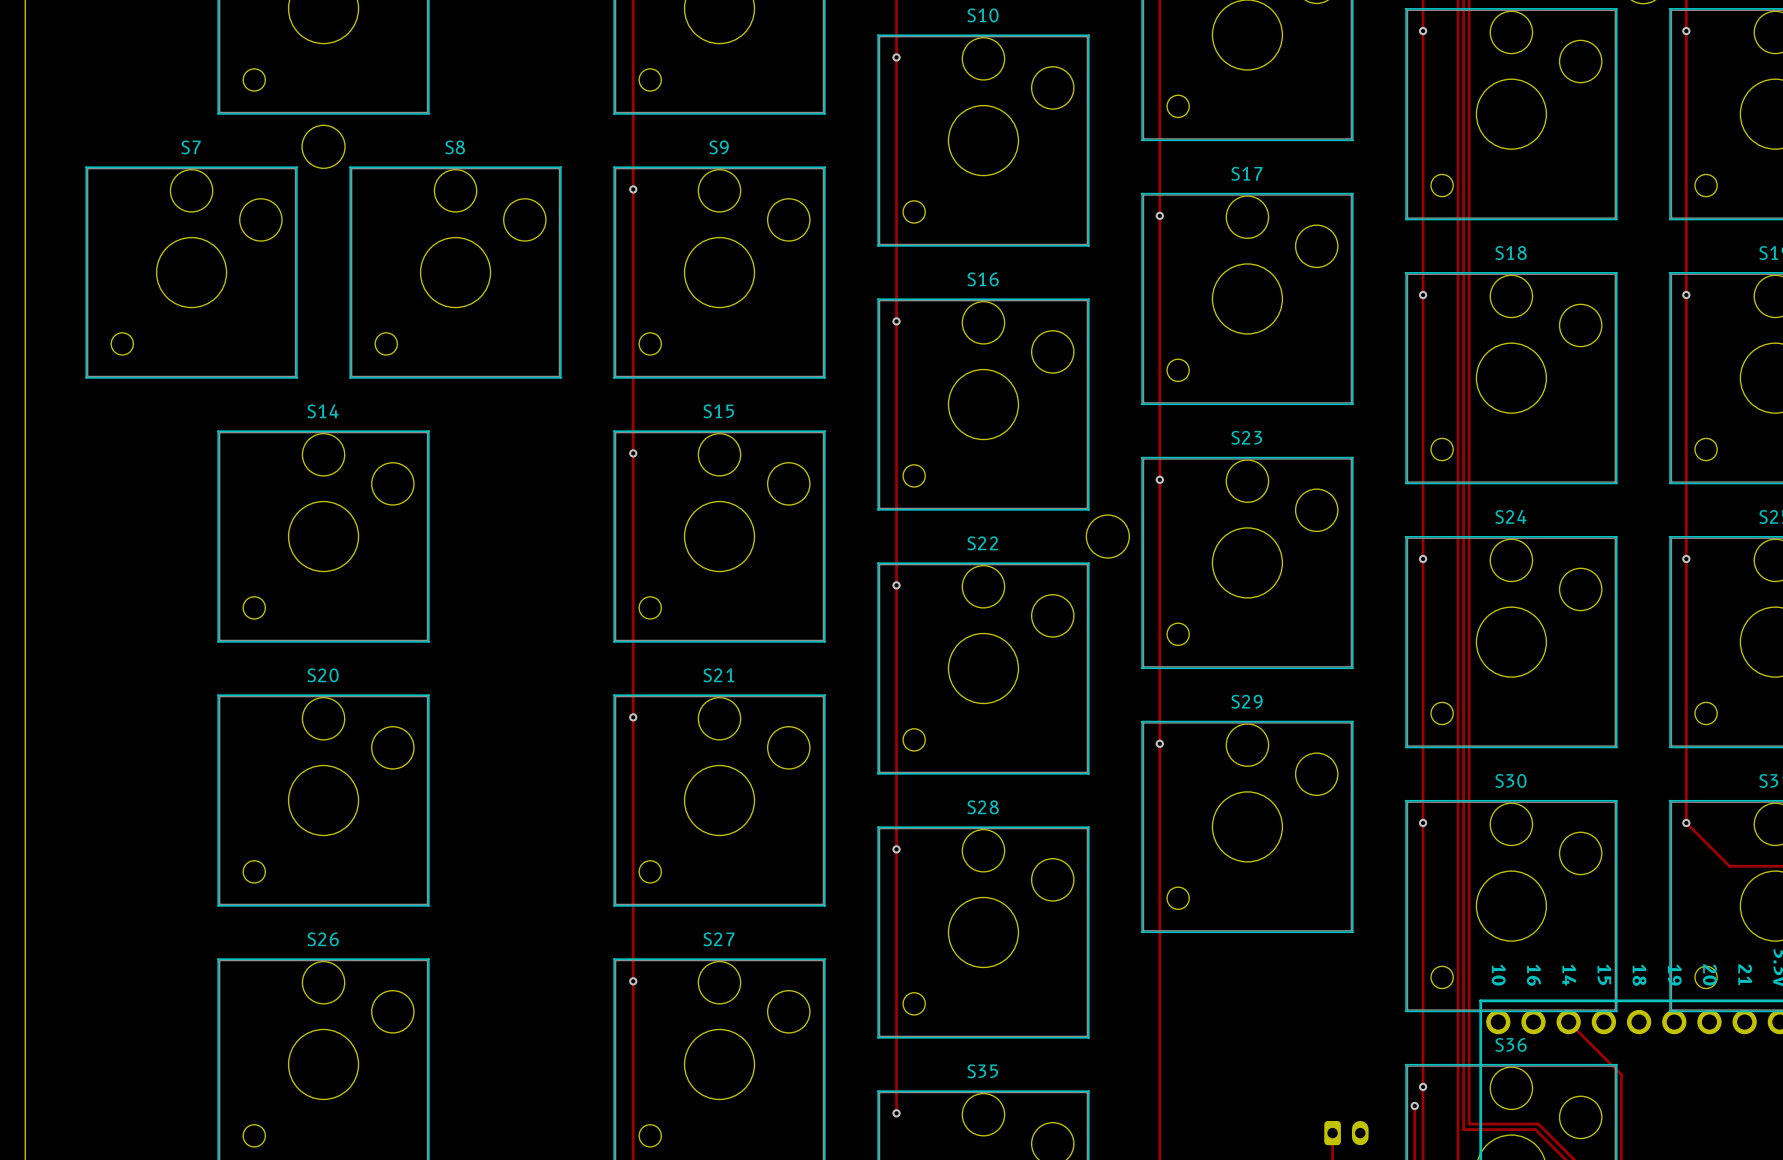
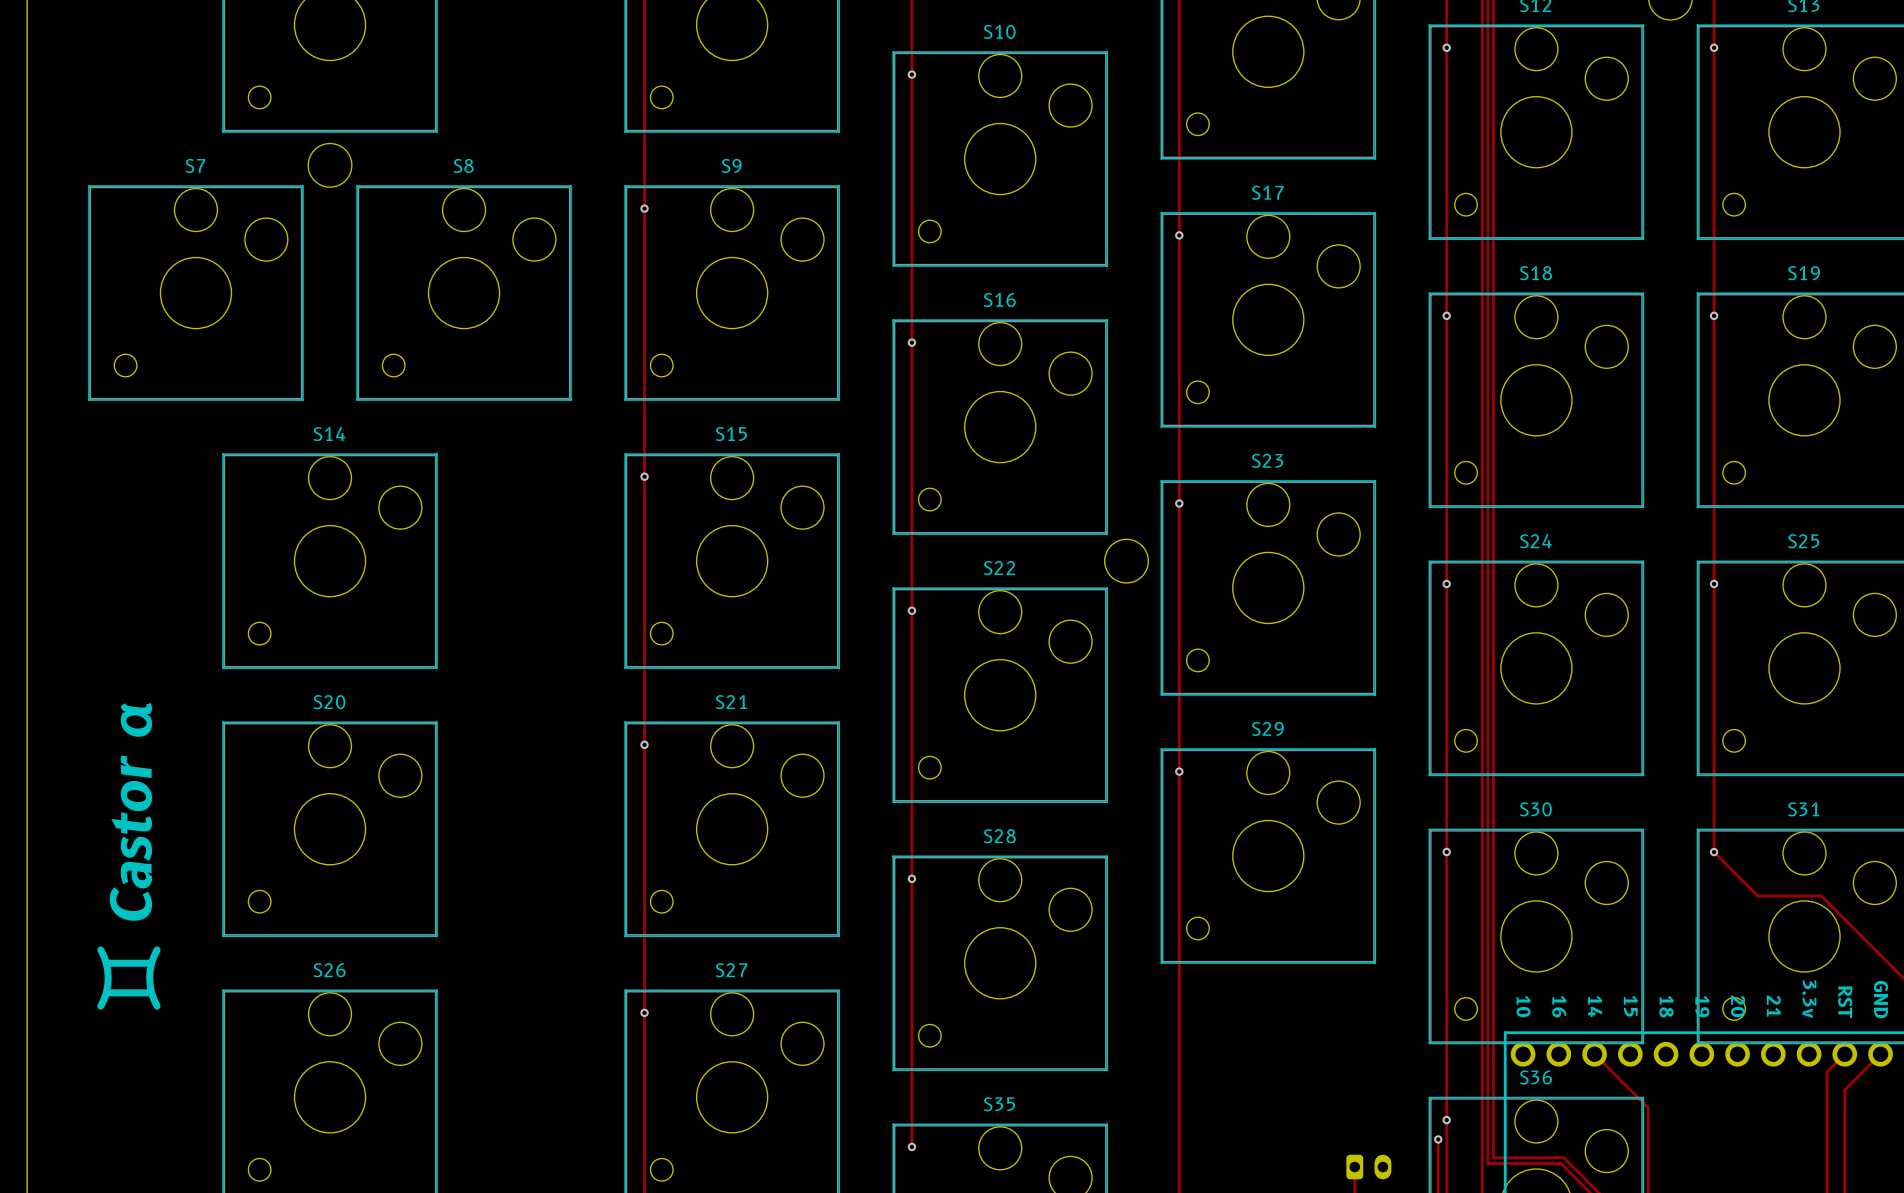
text: none -> Castor α (130, 812)
line: none -> (100, 949) (106, 963) (108, 978) (106, 992) (100, 1006)
line: none -> (157, 949) (151, 963) (149, 978) (151, 992) (157, 1006)
line: none -> (107, 963) (150, 963)
line: none -> (107, 992) (150, 992)

